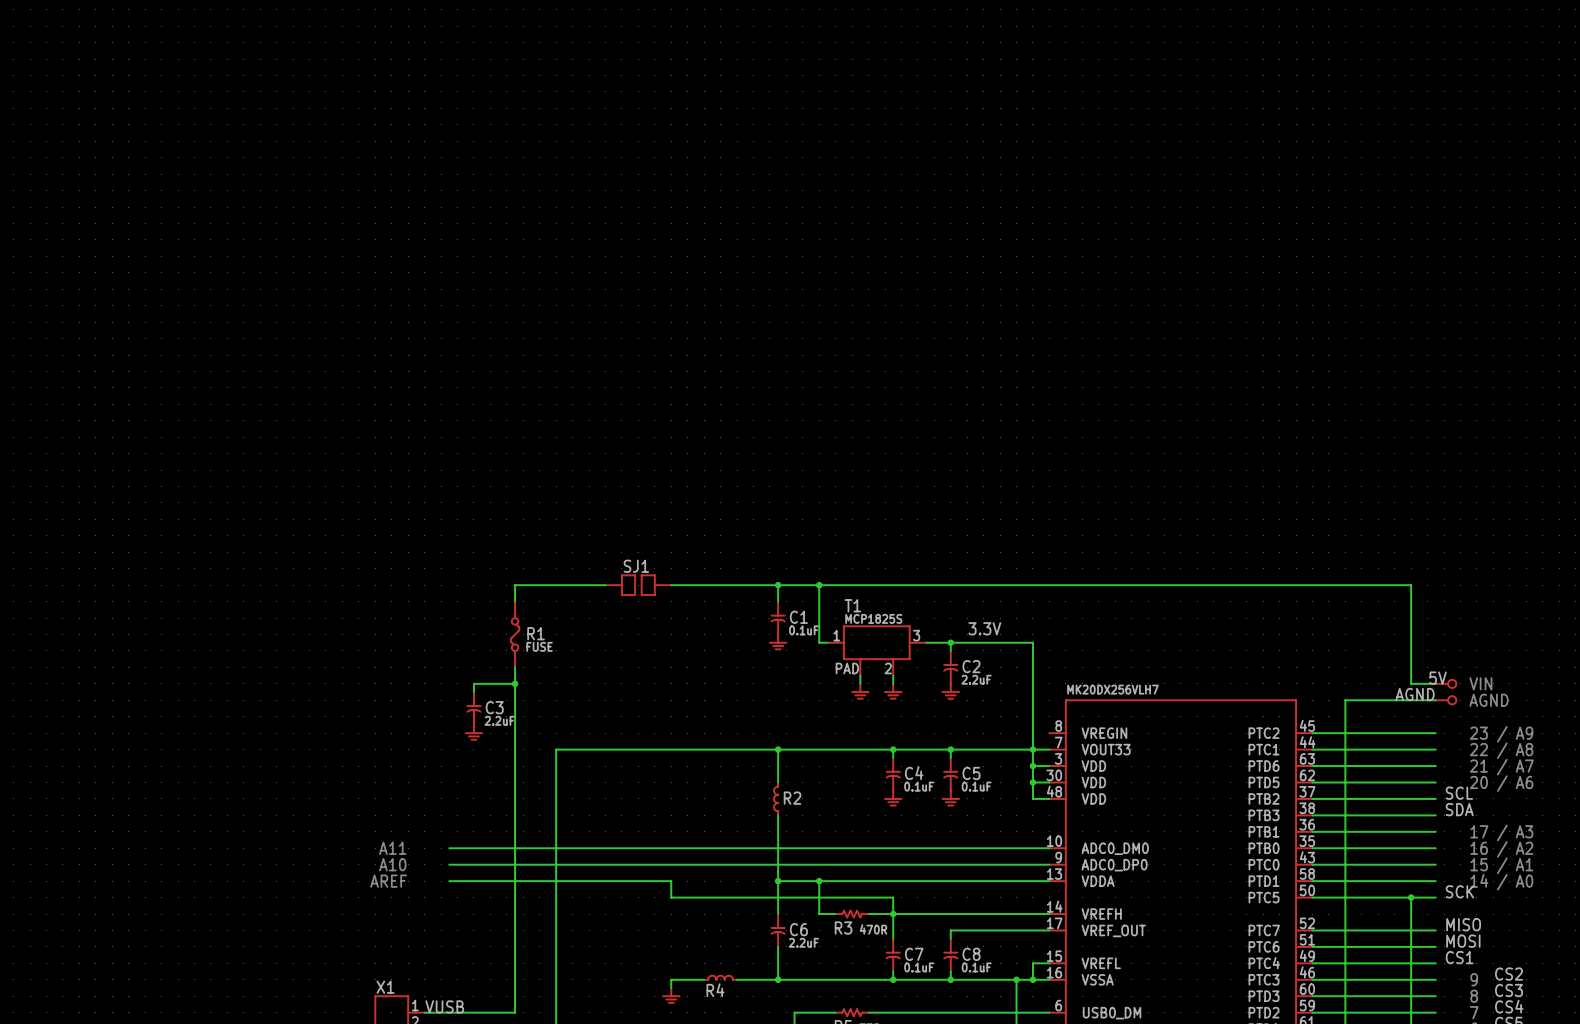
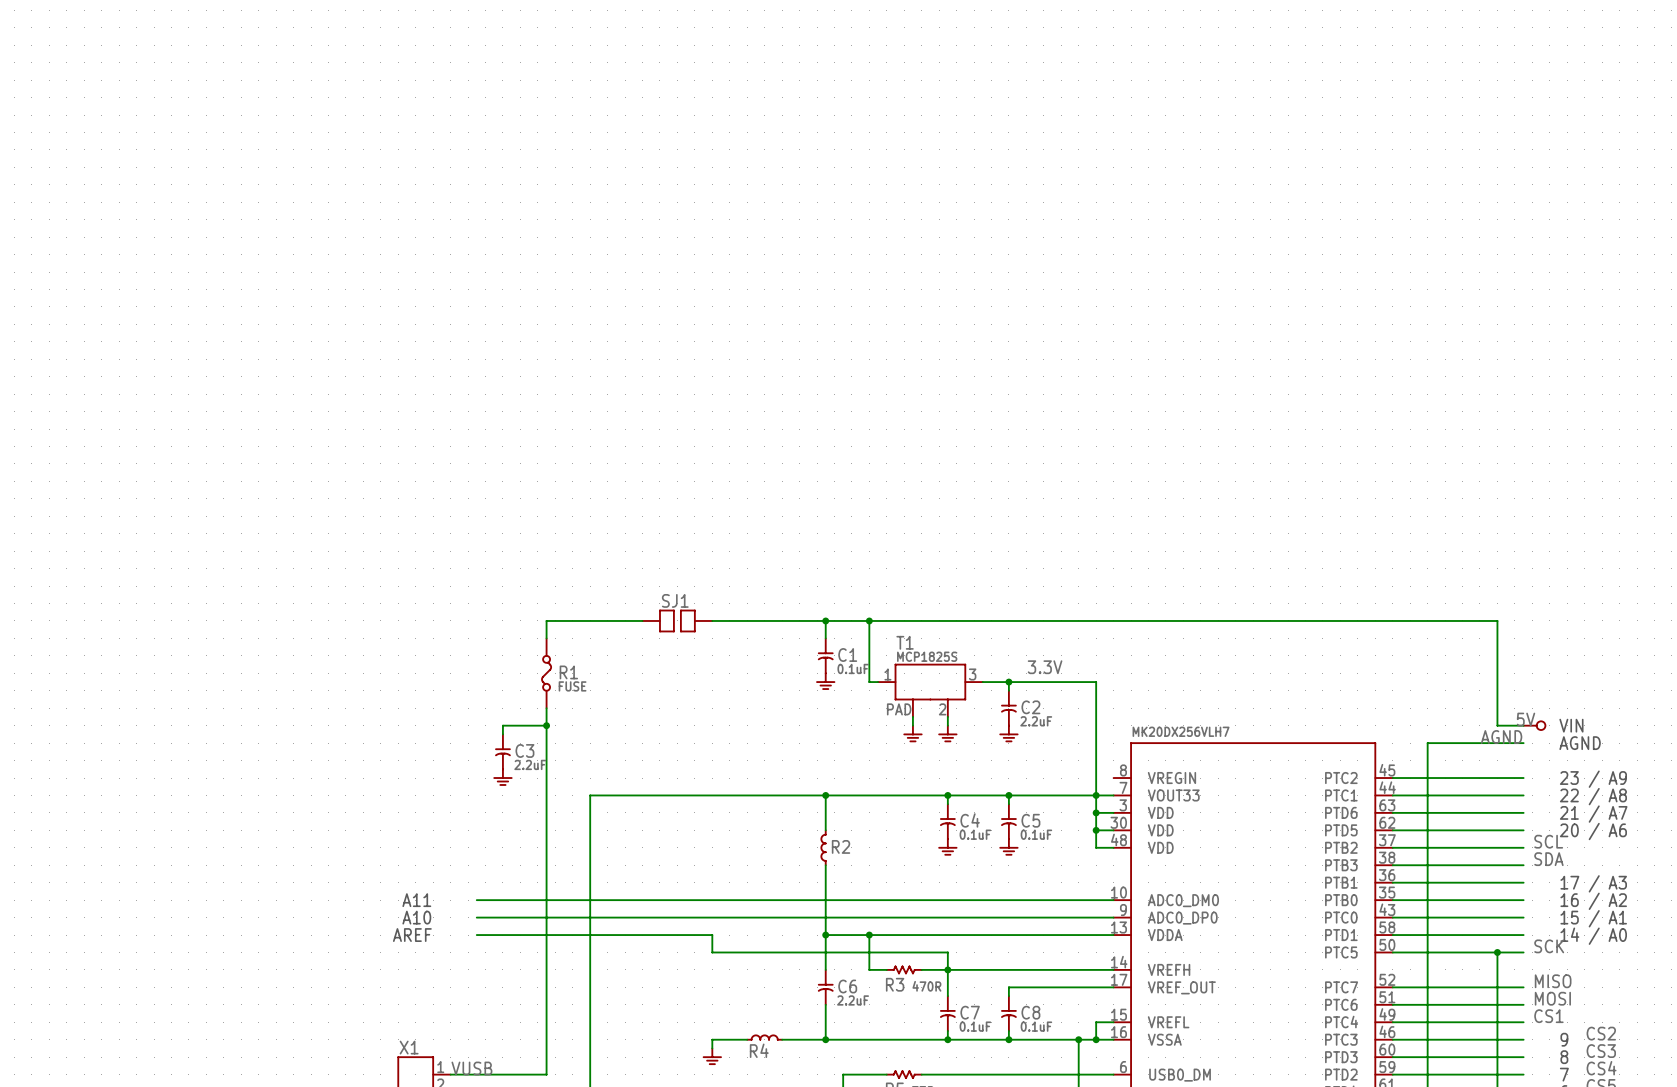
part: (1446, 700) -> none

